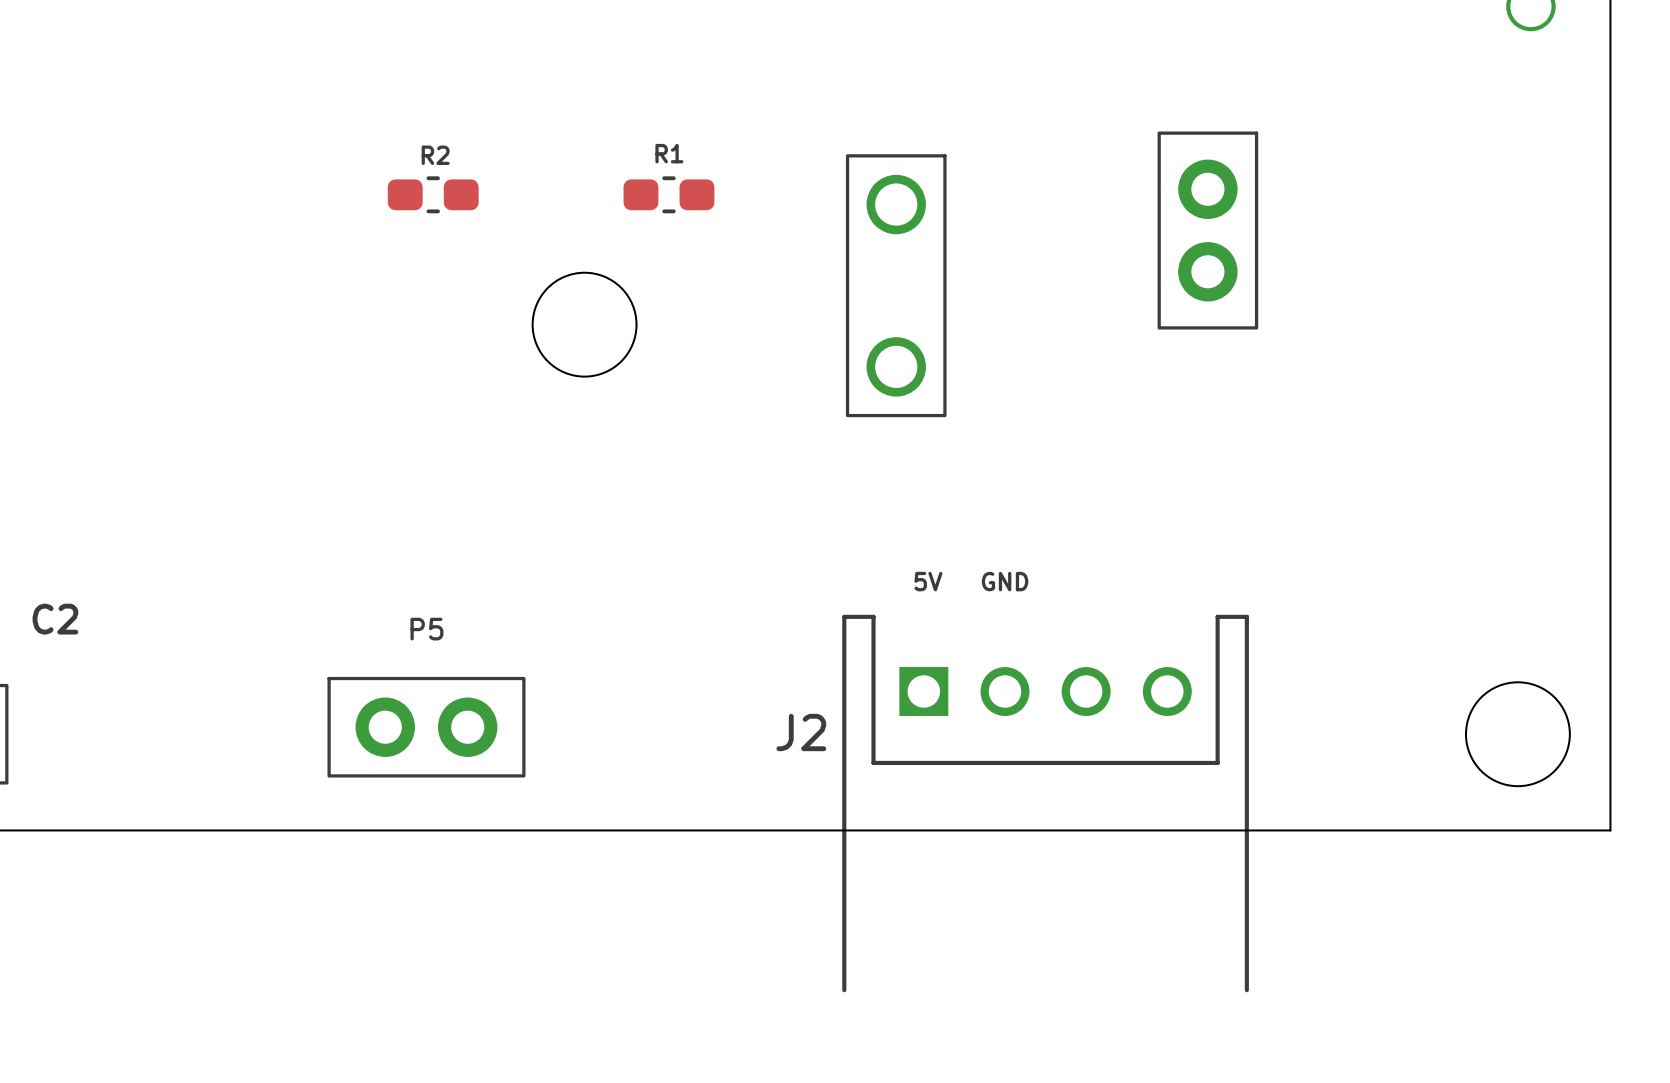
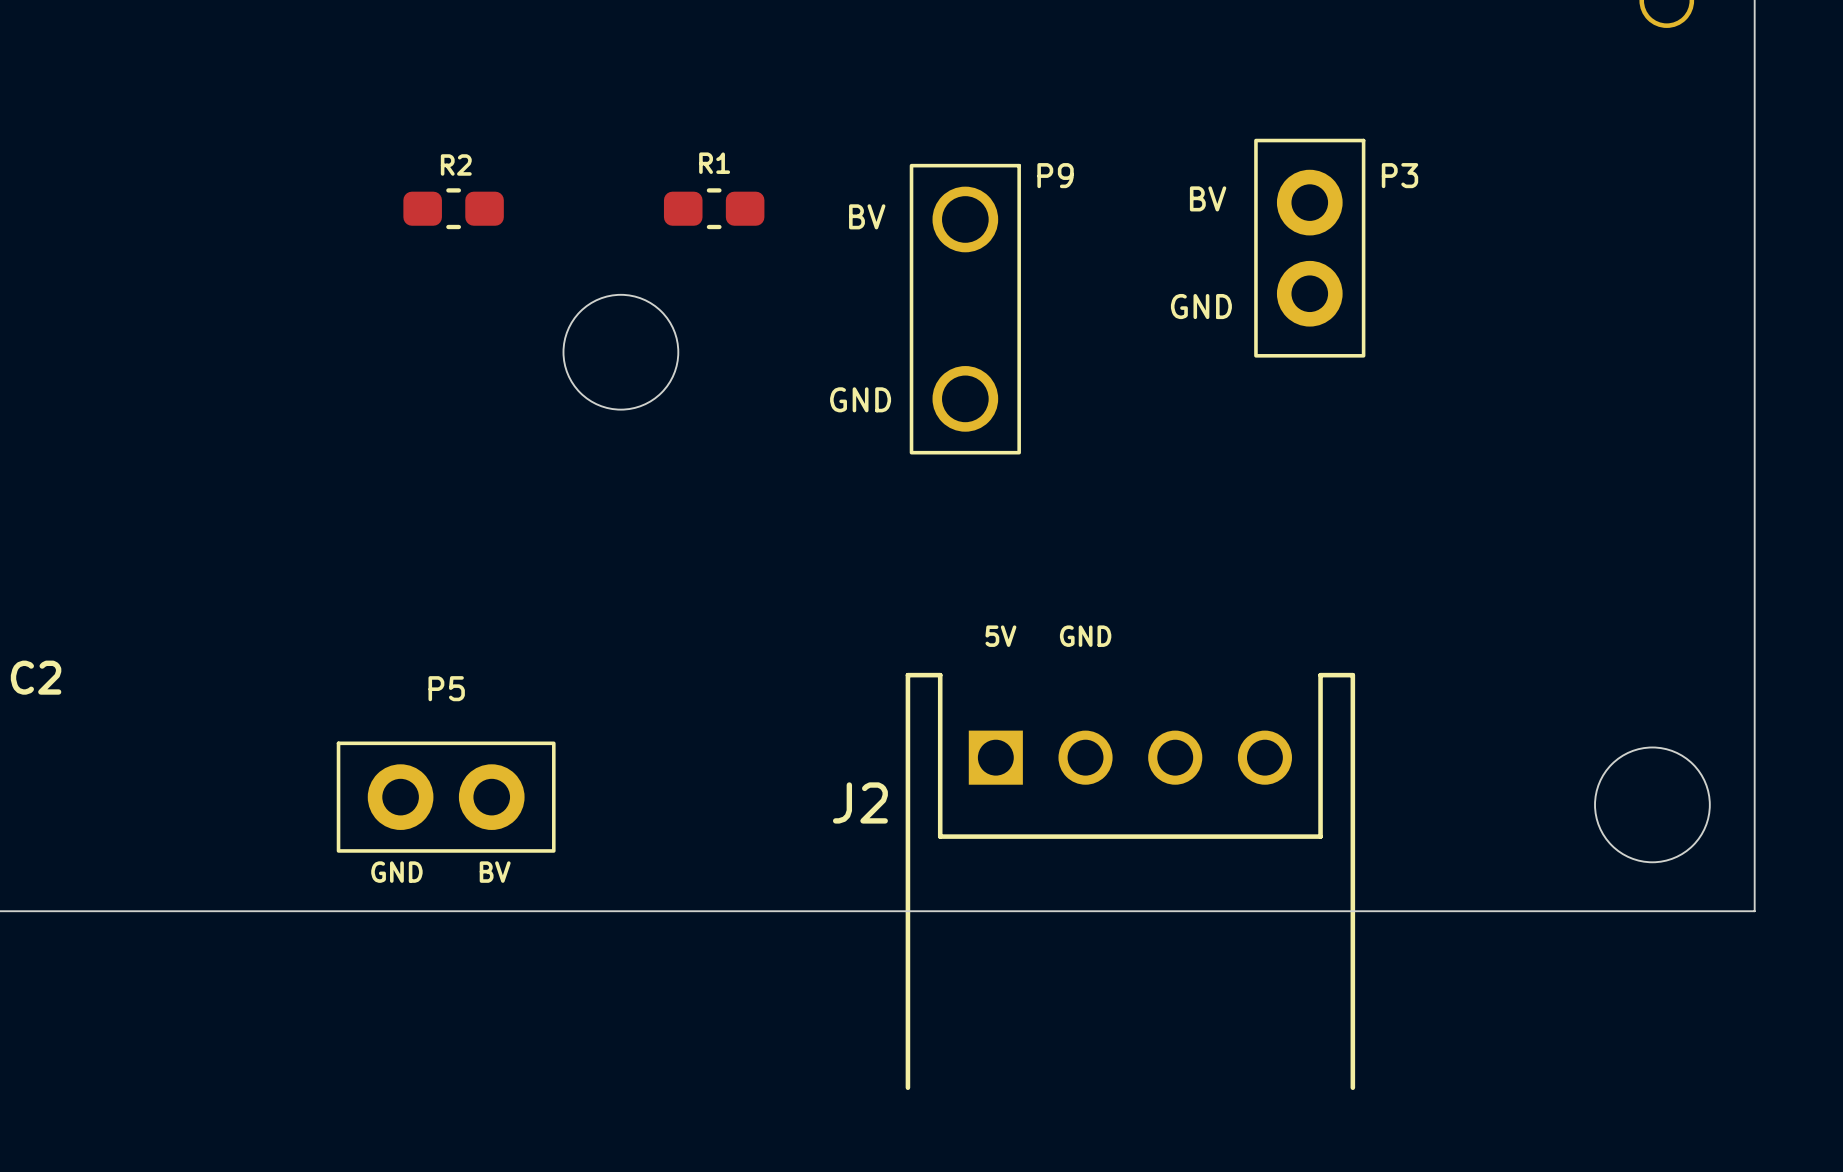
P9 name: none -> P9 (1055, 175)
P3 name: none -> P3 (1399, 175)
P3 text: none -> BV (1208, 198)
P9 text: none -> BV (867, 216)
P3 text: none -> GND (1201, 306)
P9 text: none -> GND (860, 399)
P5 text: none -> GND (396, 872)
P5 text: none -> BV (495, 872)

